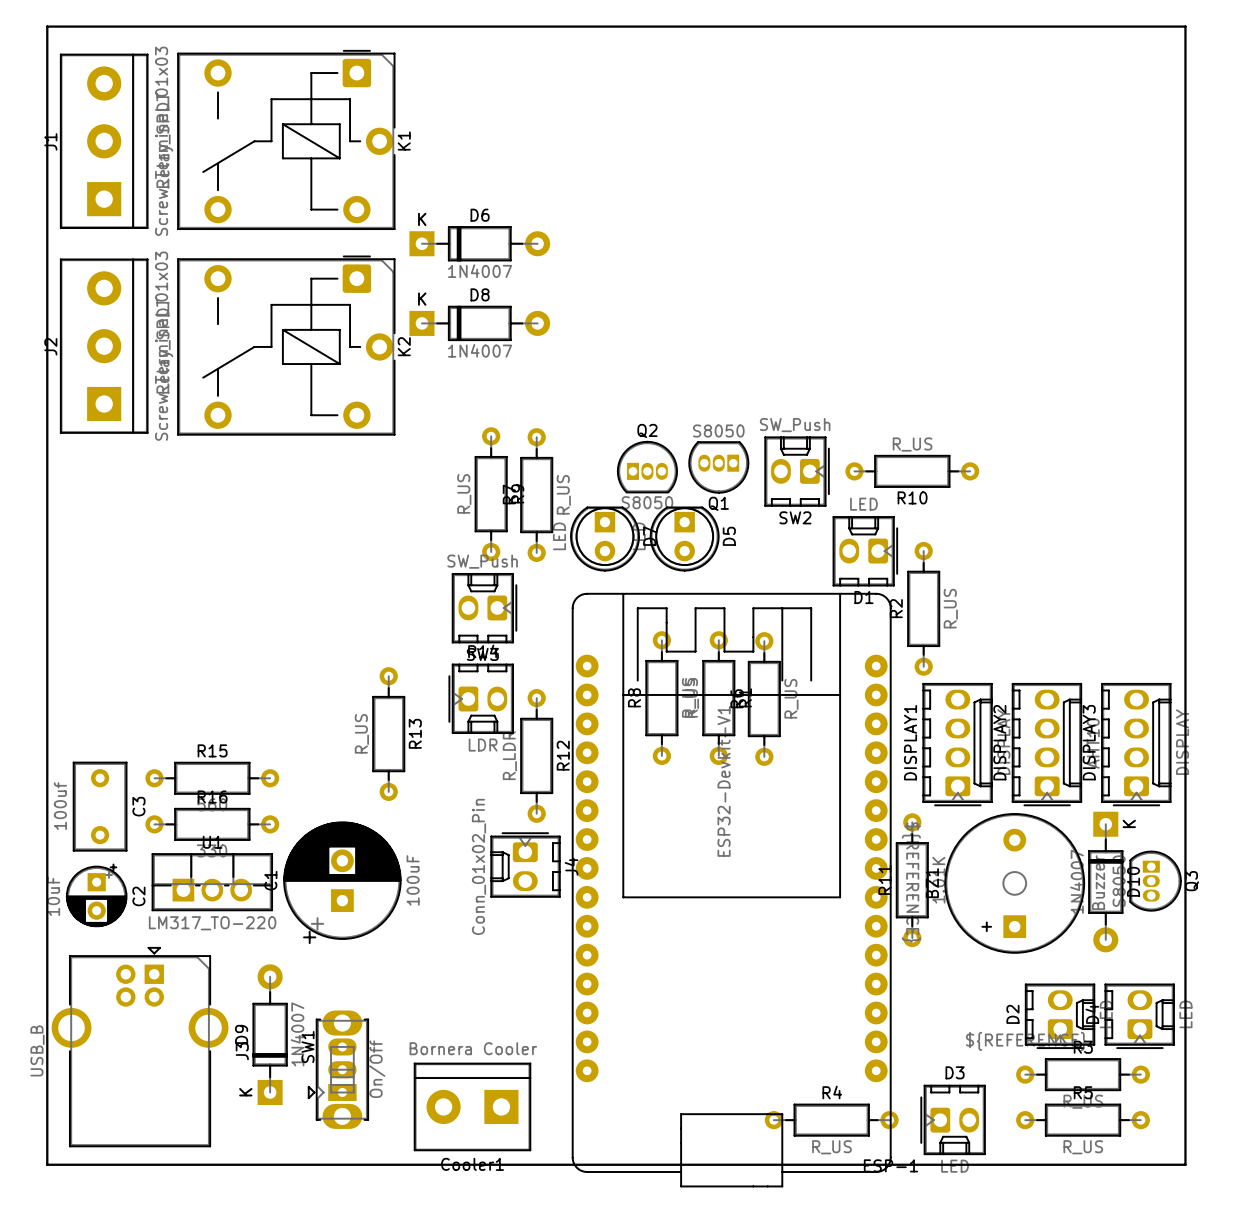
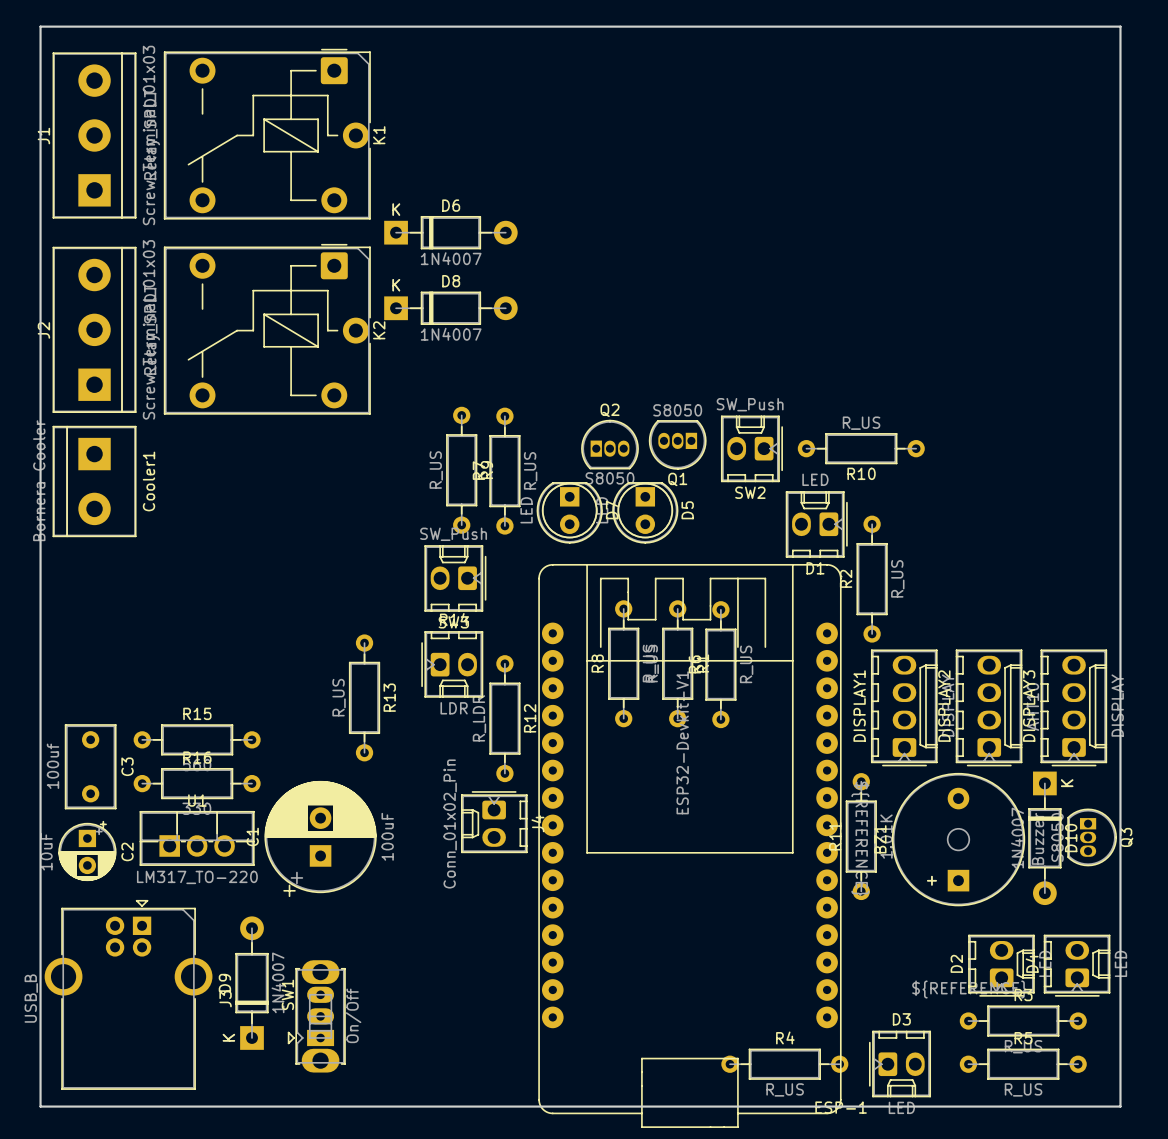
Cooler1 rotation: 0° (472, 1106) -> 90° counterclockwise (94, 481)
Cooler1 position: (472, 1106) -> (94, 481)

